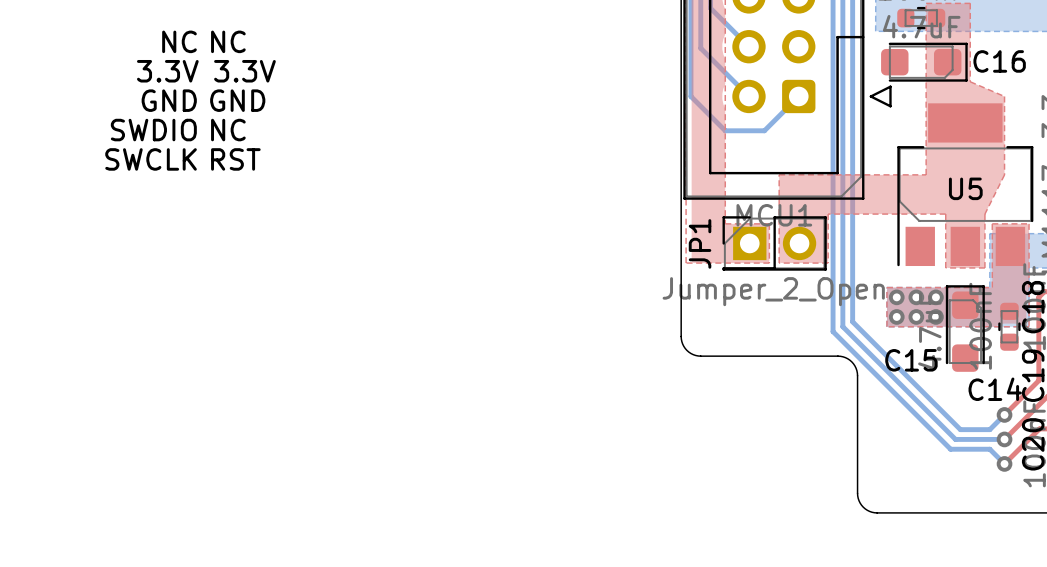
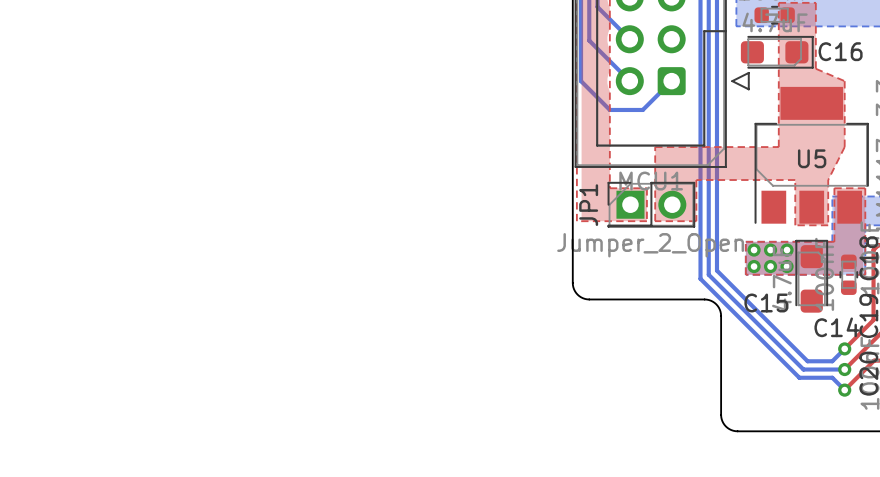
text: NC (179, 41) -> none
text: NC (228, 41) -> none
text: 3.3V (167, 71) -> none
text: 3.3V (244, 71) -> none
text: GND (169, 100) -> none
text: GND (237, 100) -> none
text: SWDIO (153, 130) -> none
text: NC (228, 130) -> none
text: SWCLK (151, 159) -> none
text: RST (235, 159) -> none

